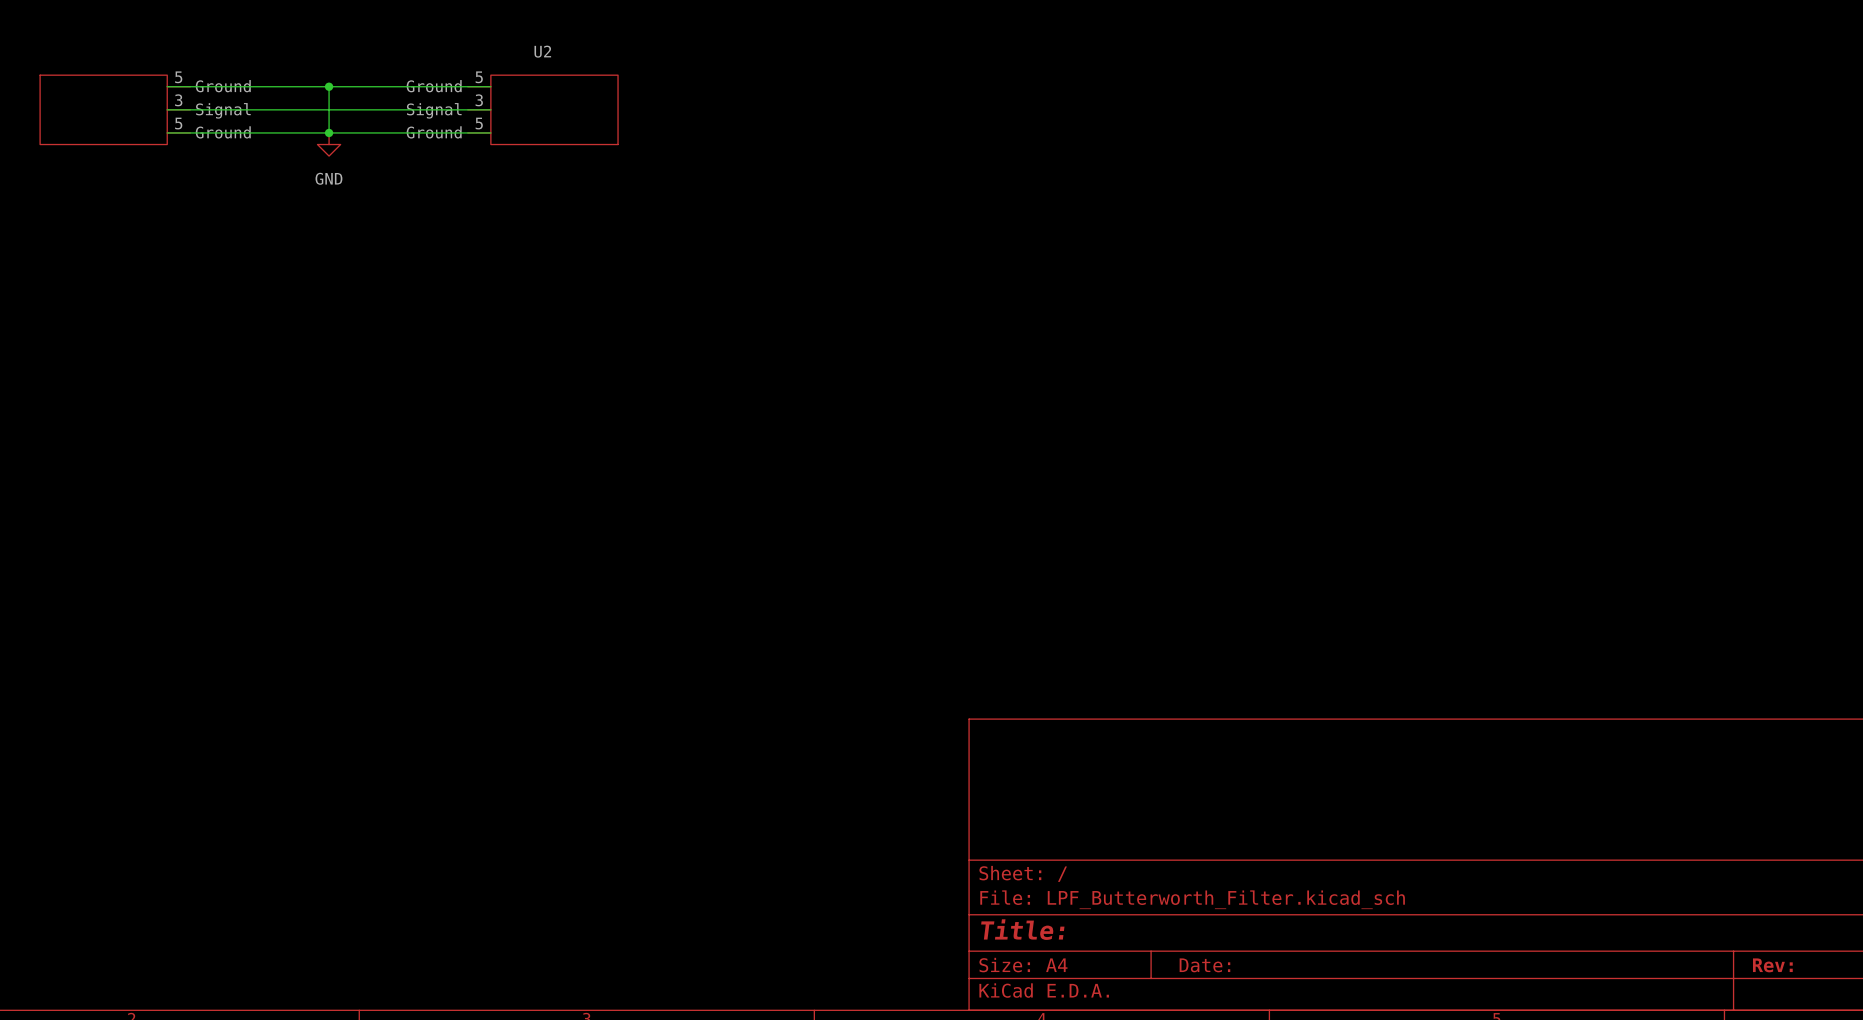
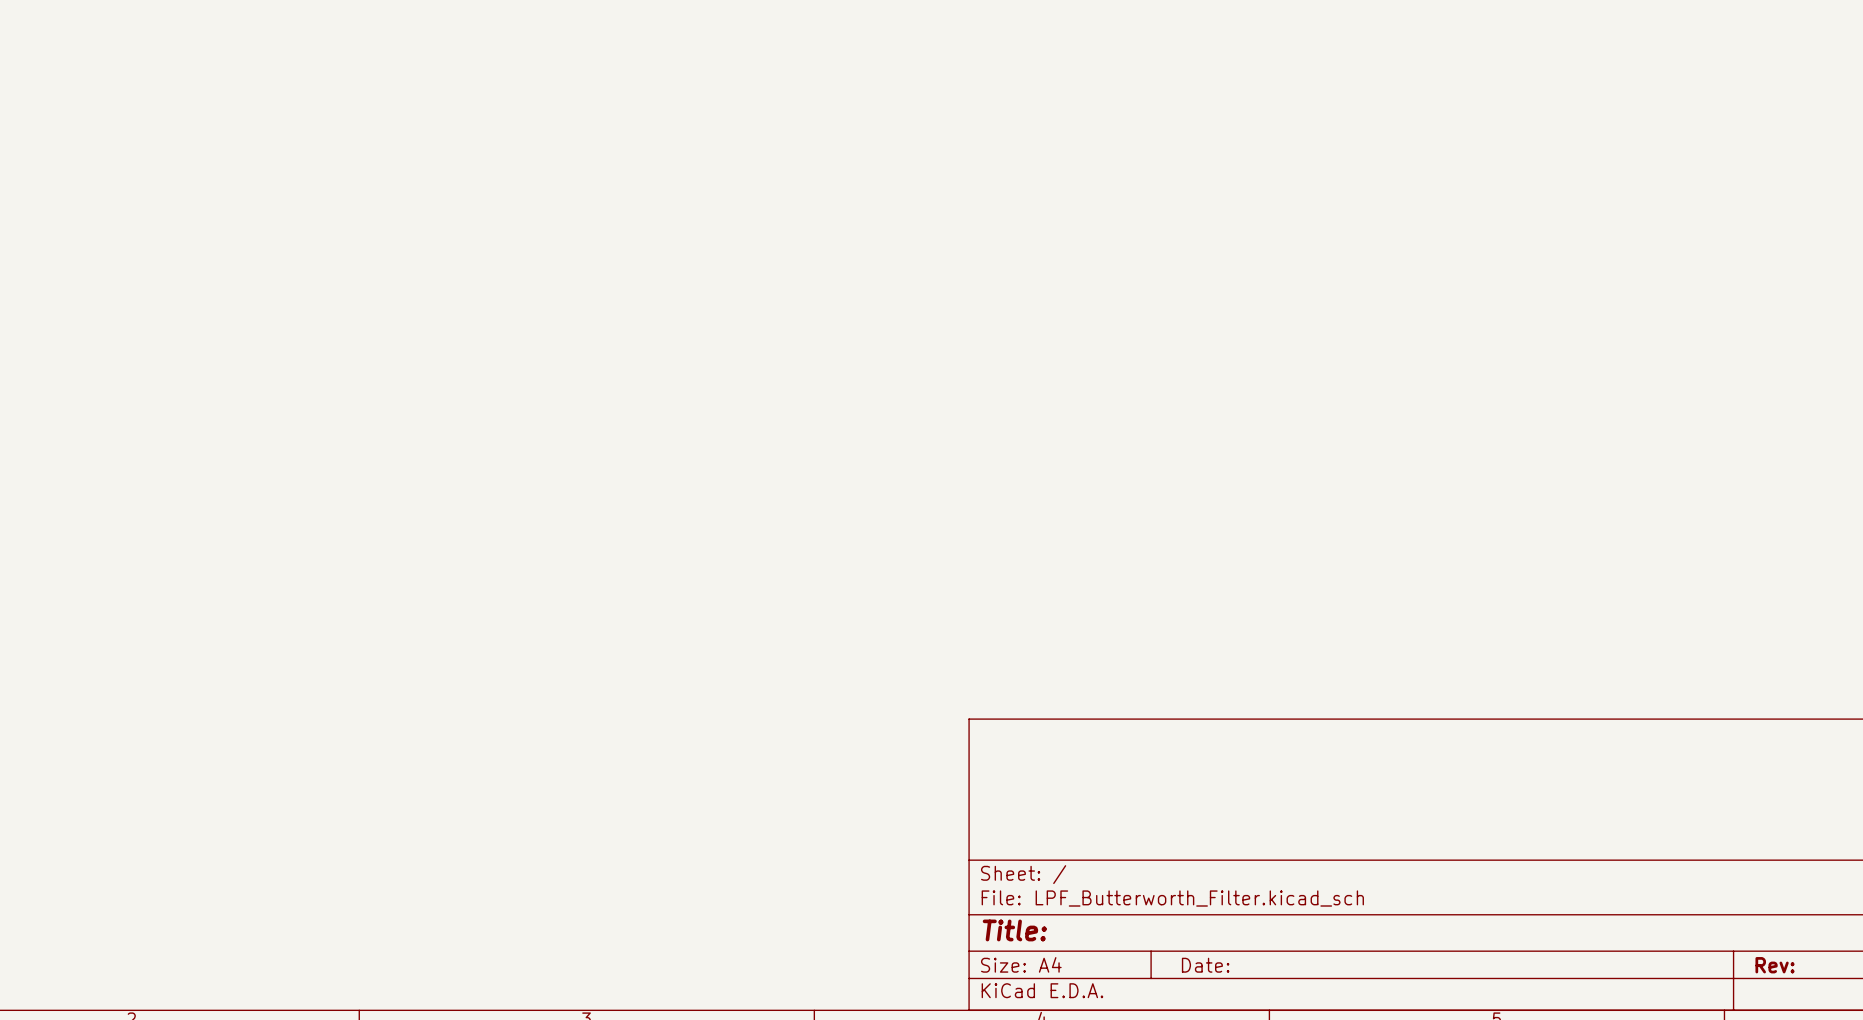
wire: (167, 86) (490, 86) -> none
wire: (329, 86) (329, 132) -> none
junction: (329, 86) -> none
part: (115, 109) -> none
wire: (167, 109) (490, 109) -> none
U2: (542, 109) -> none
wire: (167, 132) (490, 132) -> none
junction: (329, 132) -> none
power symbol: GND (329, 144) -> none

